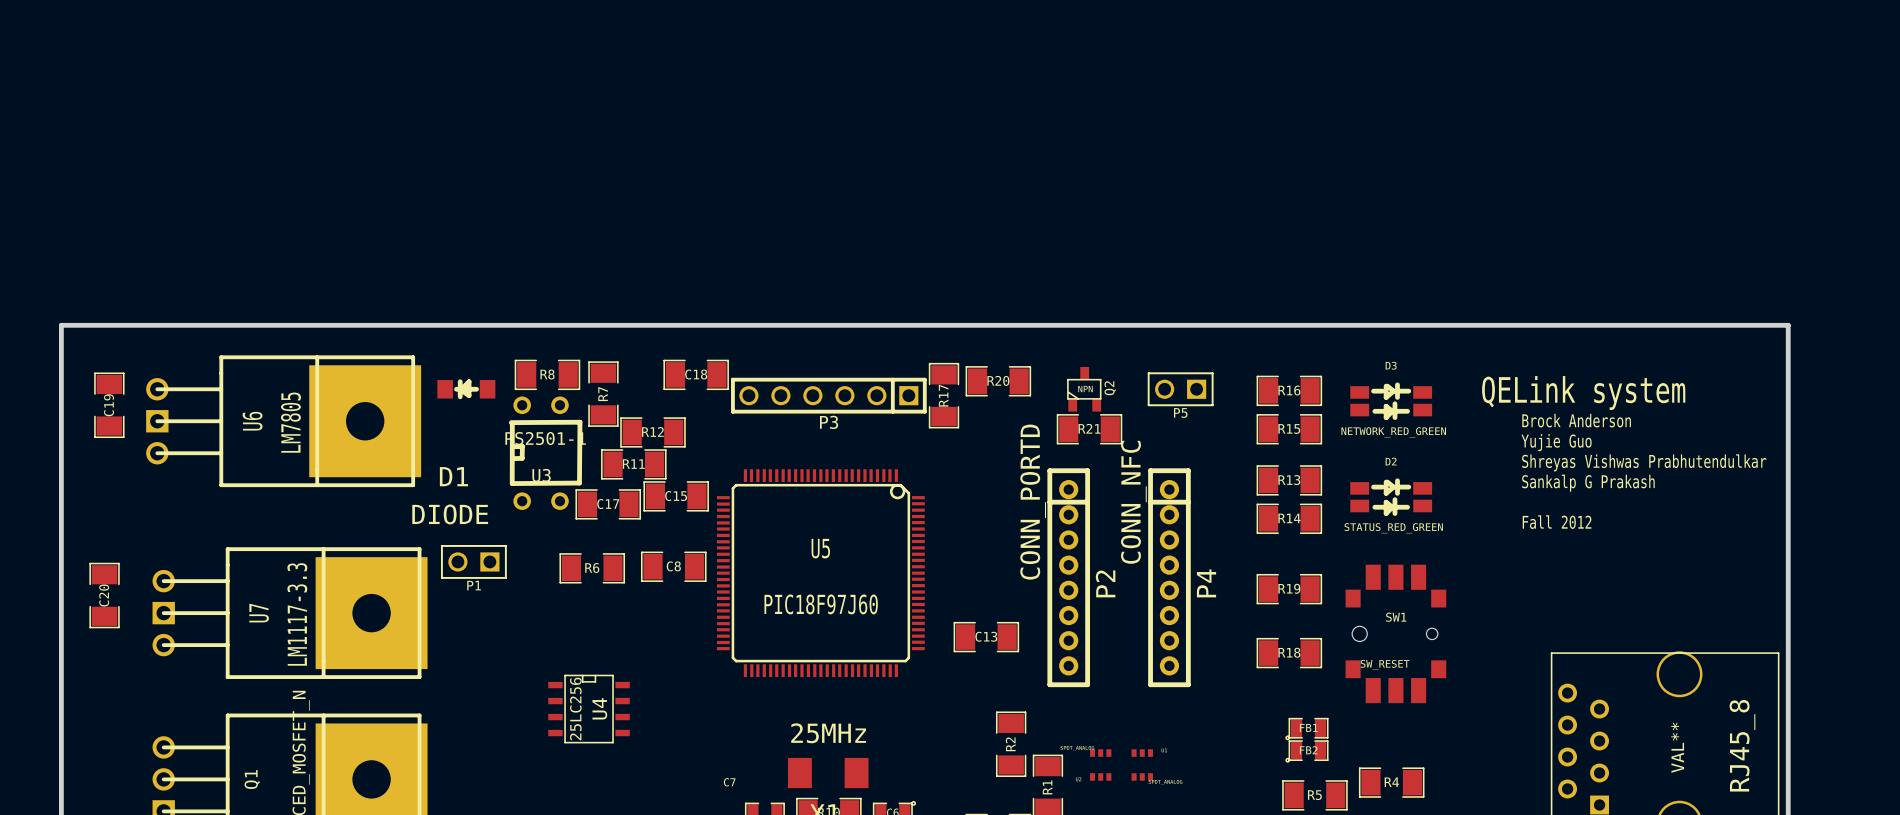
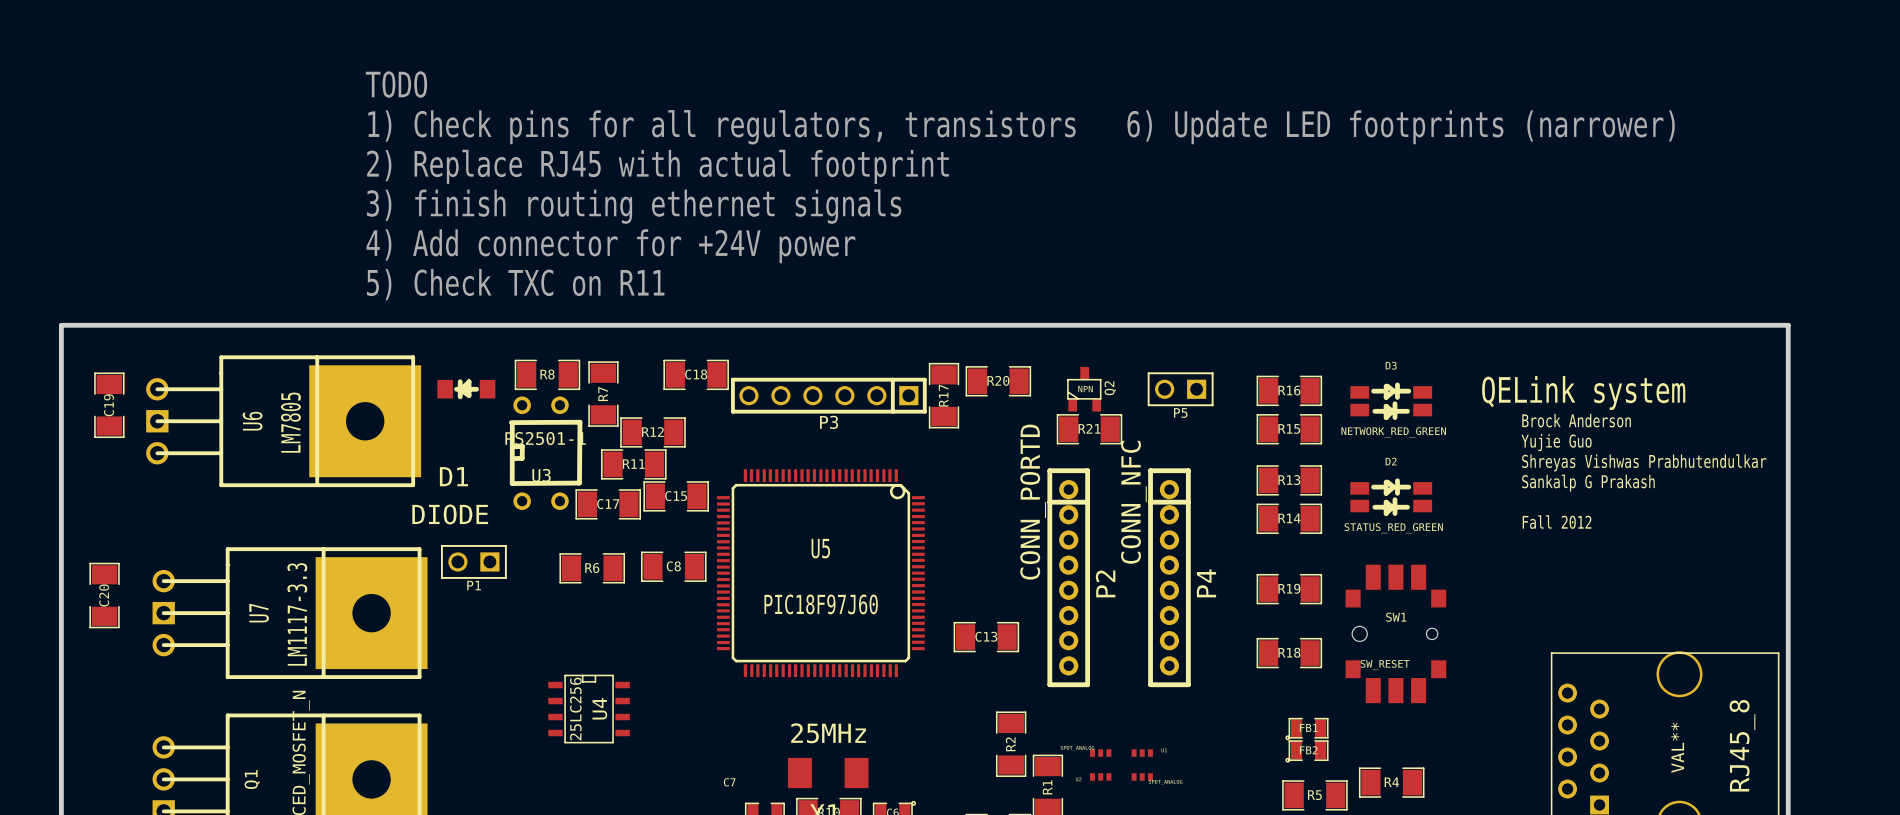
text: none -> TODO (396, 84)
text: none -> 1) Check pins for all regulators, transistors 6) Update LED footprints (narrower) (1021, 127)
text: none -> 2) Replace RJ45 with actual footprint (657, 166)
text: none -> 3) finish routing ethernet signals (634, 206)
text: none -> 4) Add connector for +24V power (610, 246)
text: none -> 5) Check TXC on R11 (515, 284)

